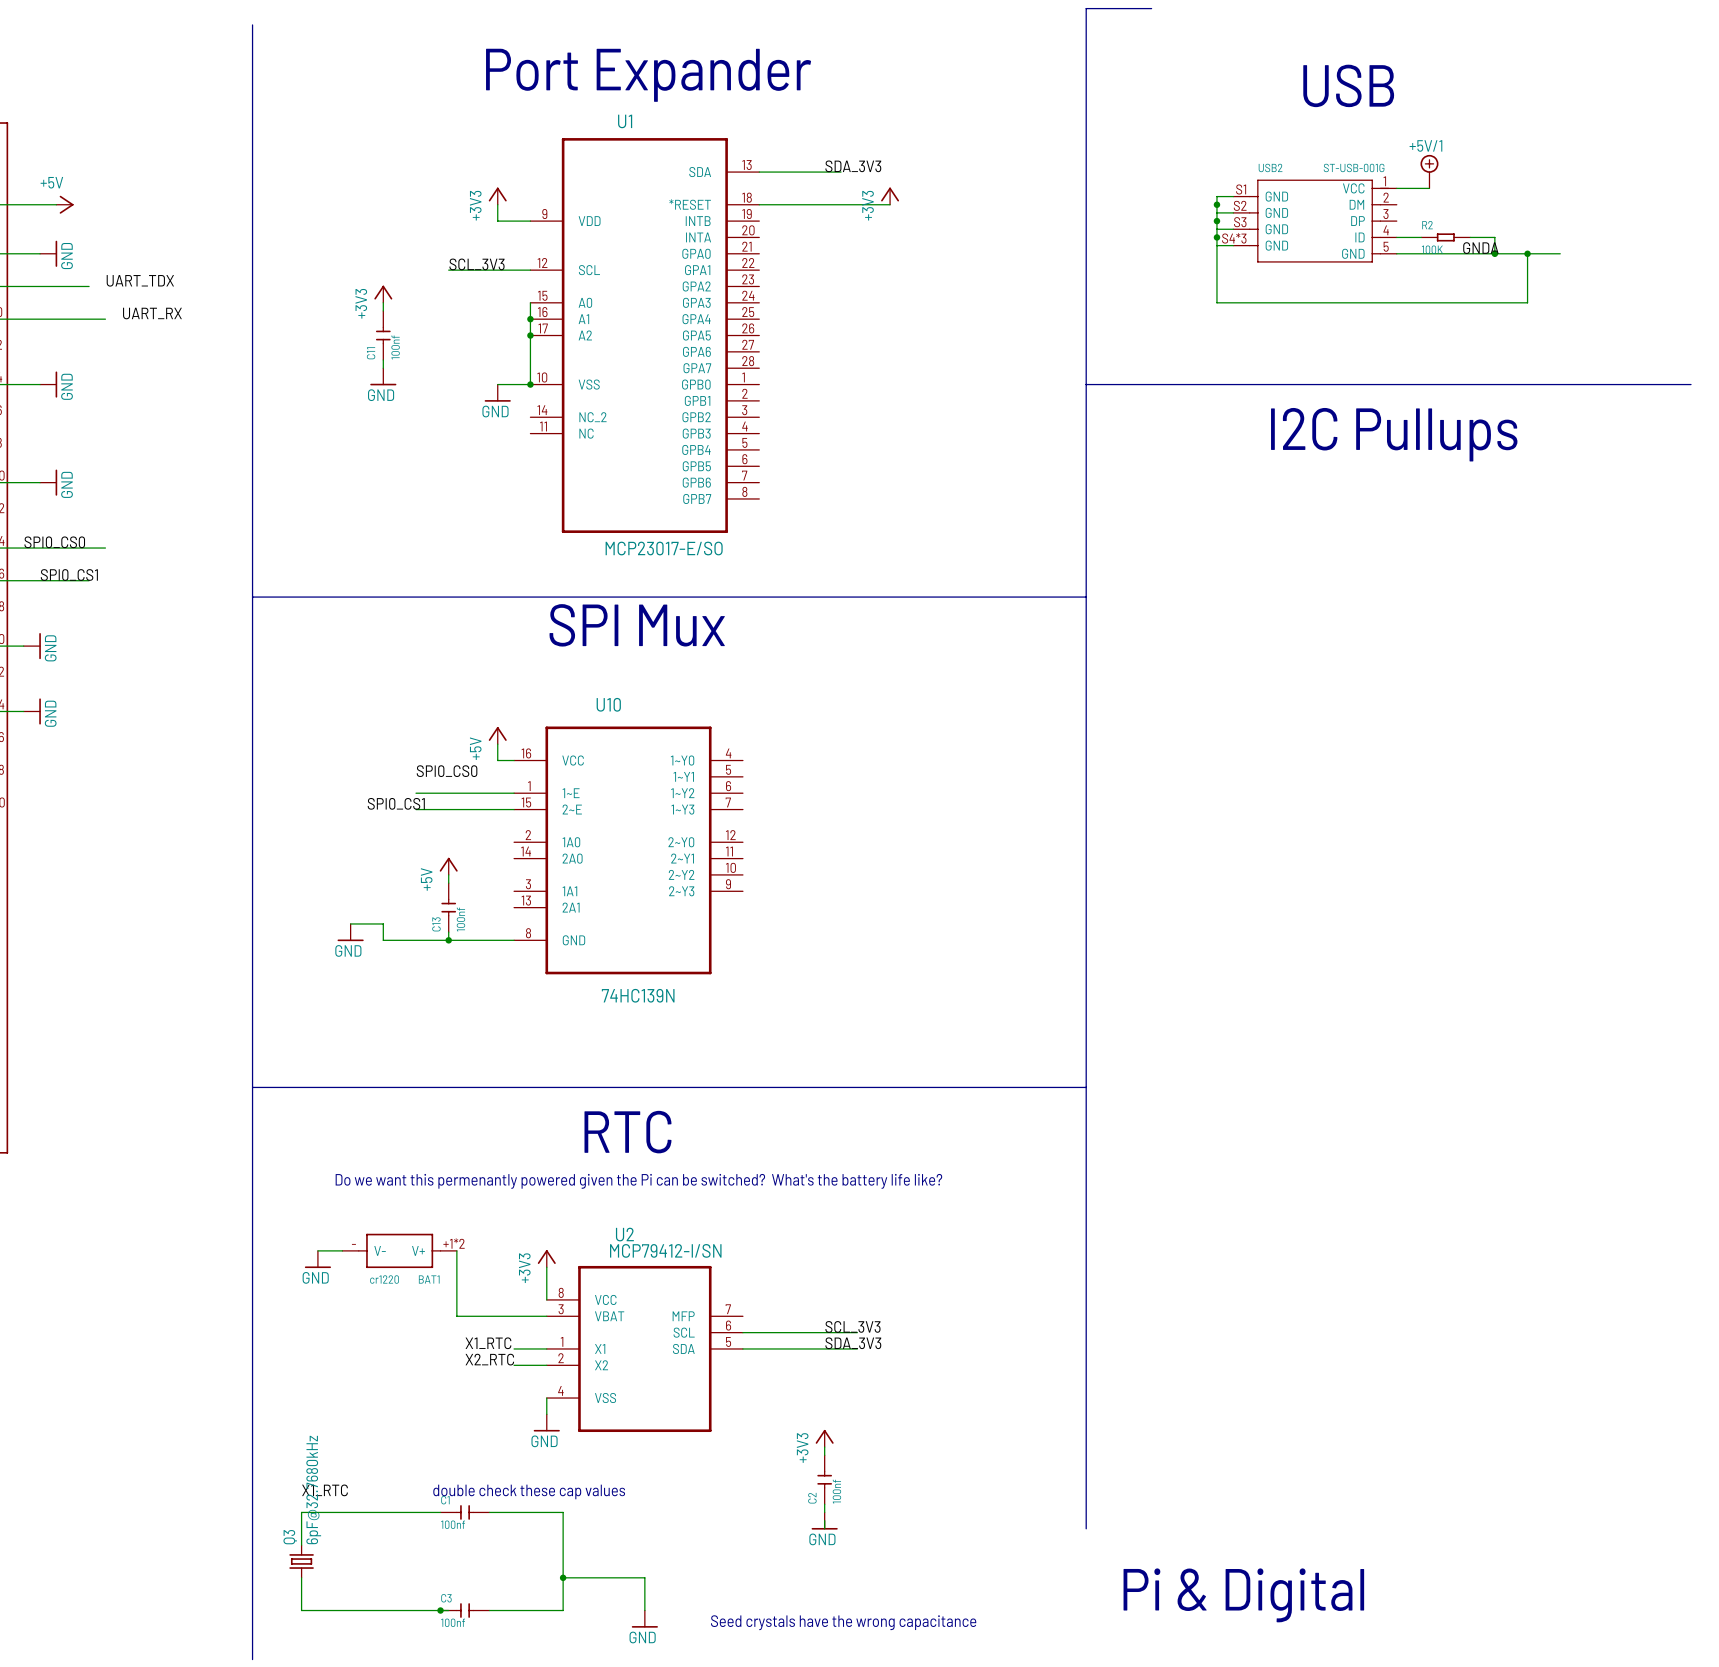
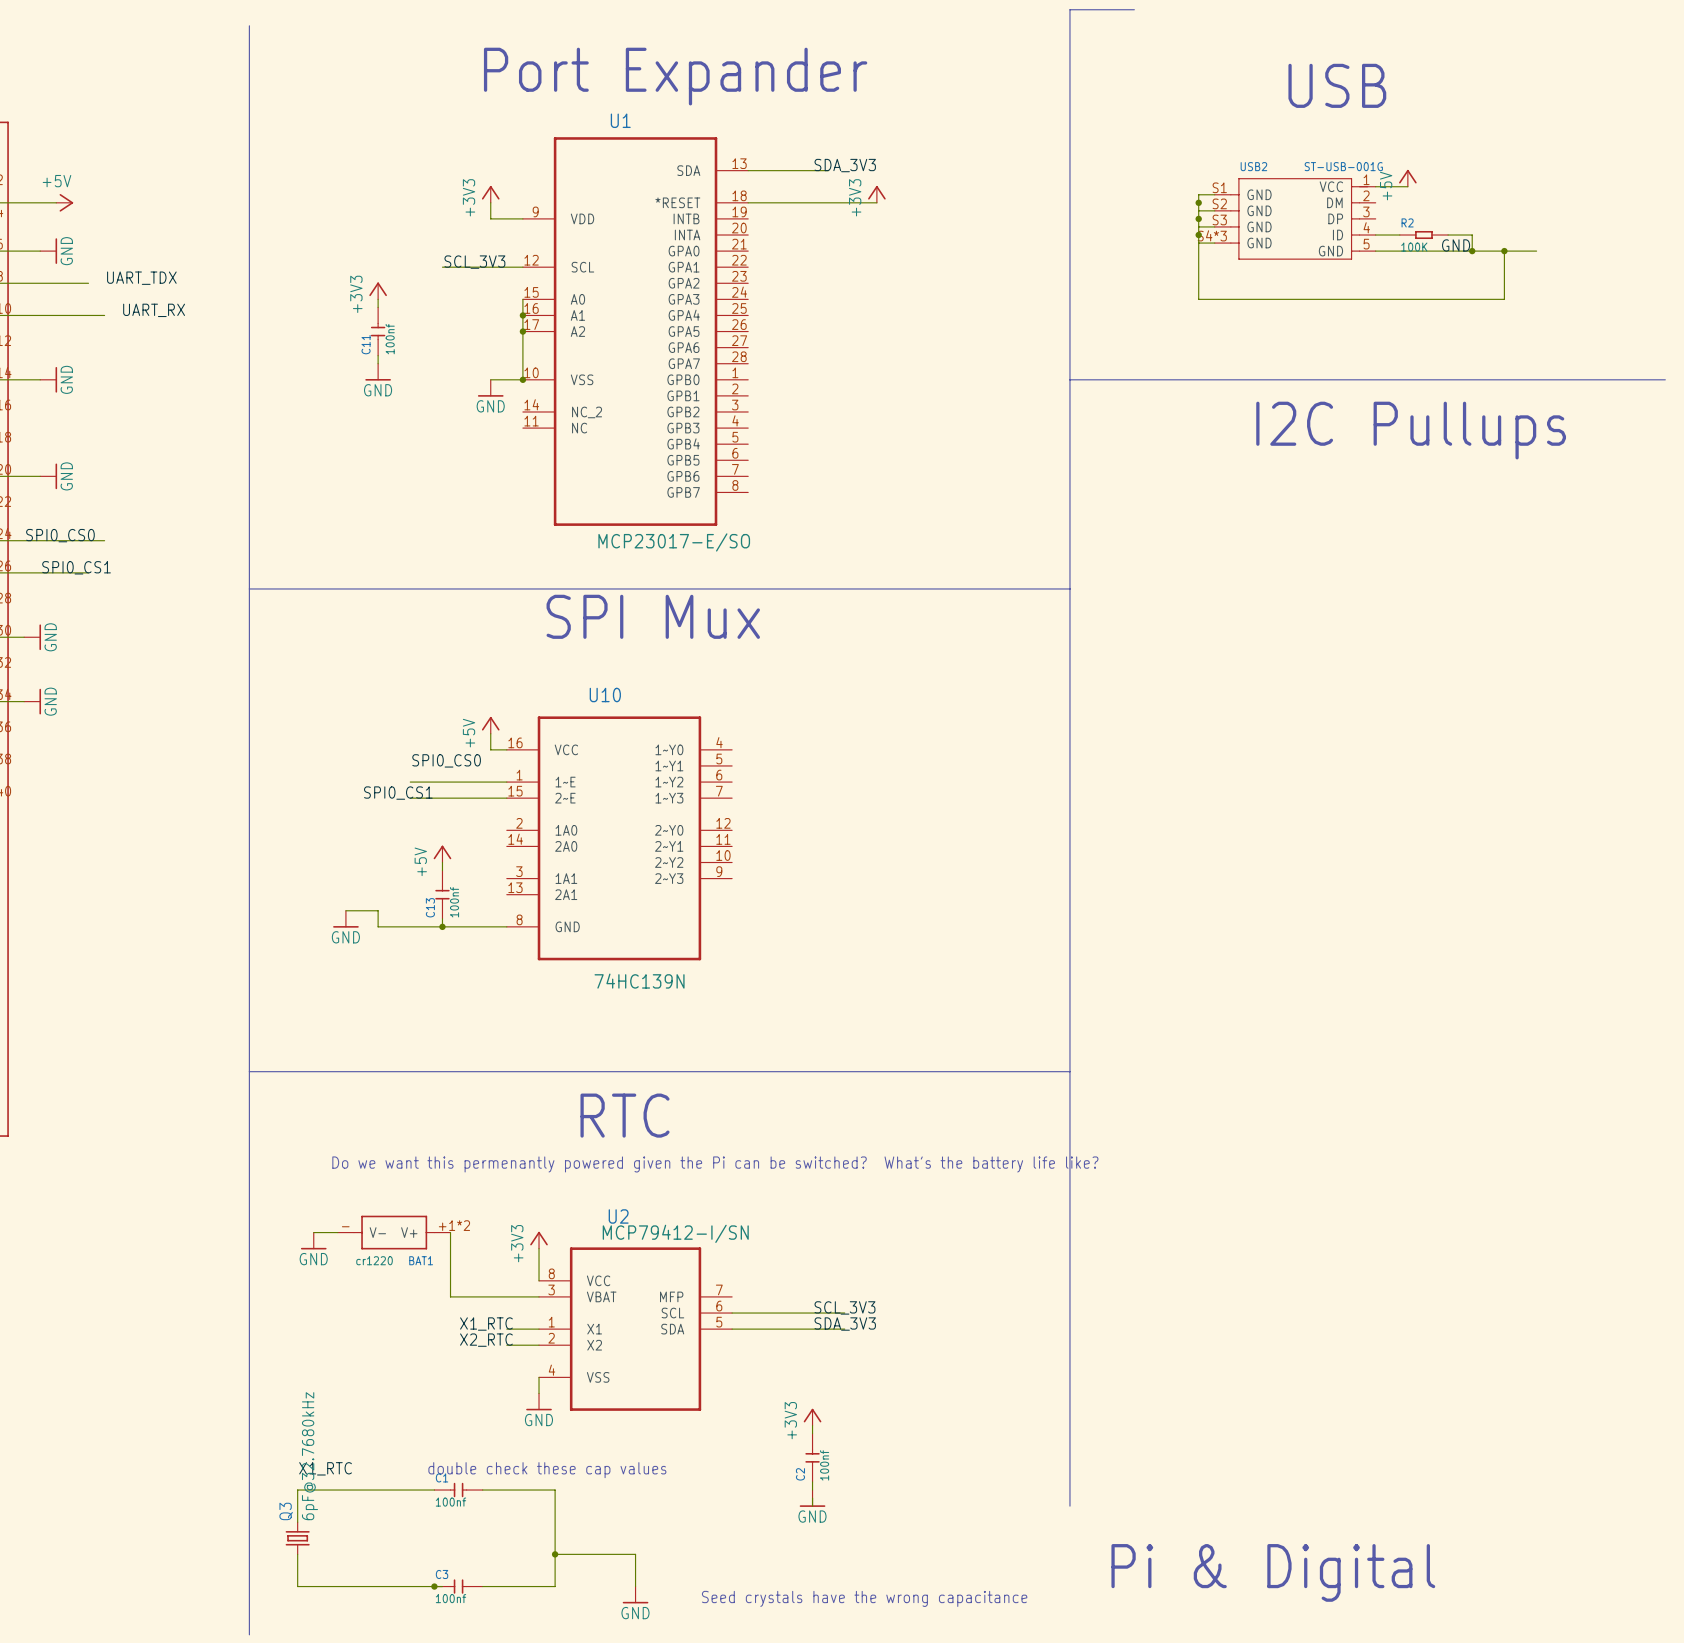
power symbol: +5V/1 (1429, 171) -> none
power symbol: none -> +5V (1407, 178)
label: GNDA (1480, 248) -> GND (1456, 245)

